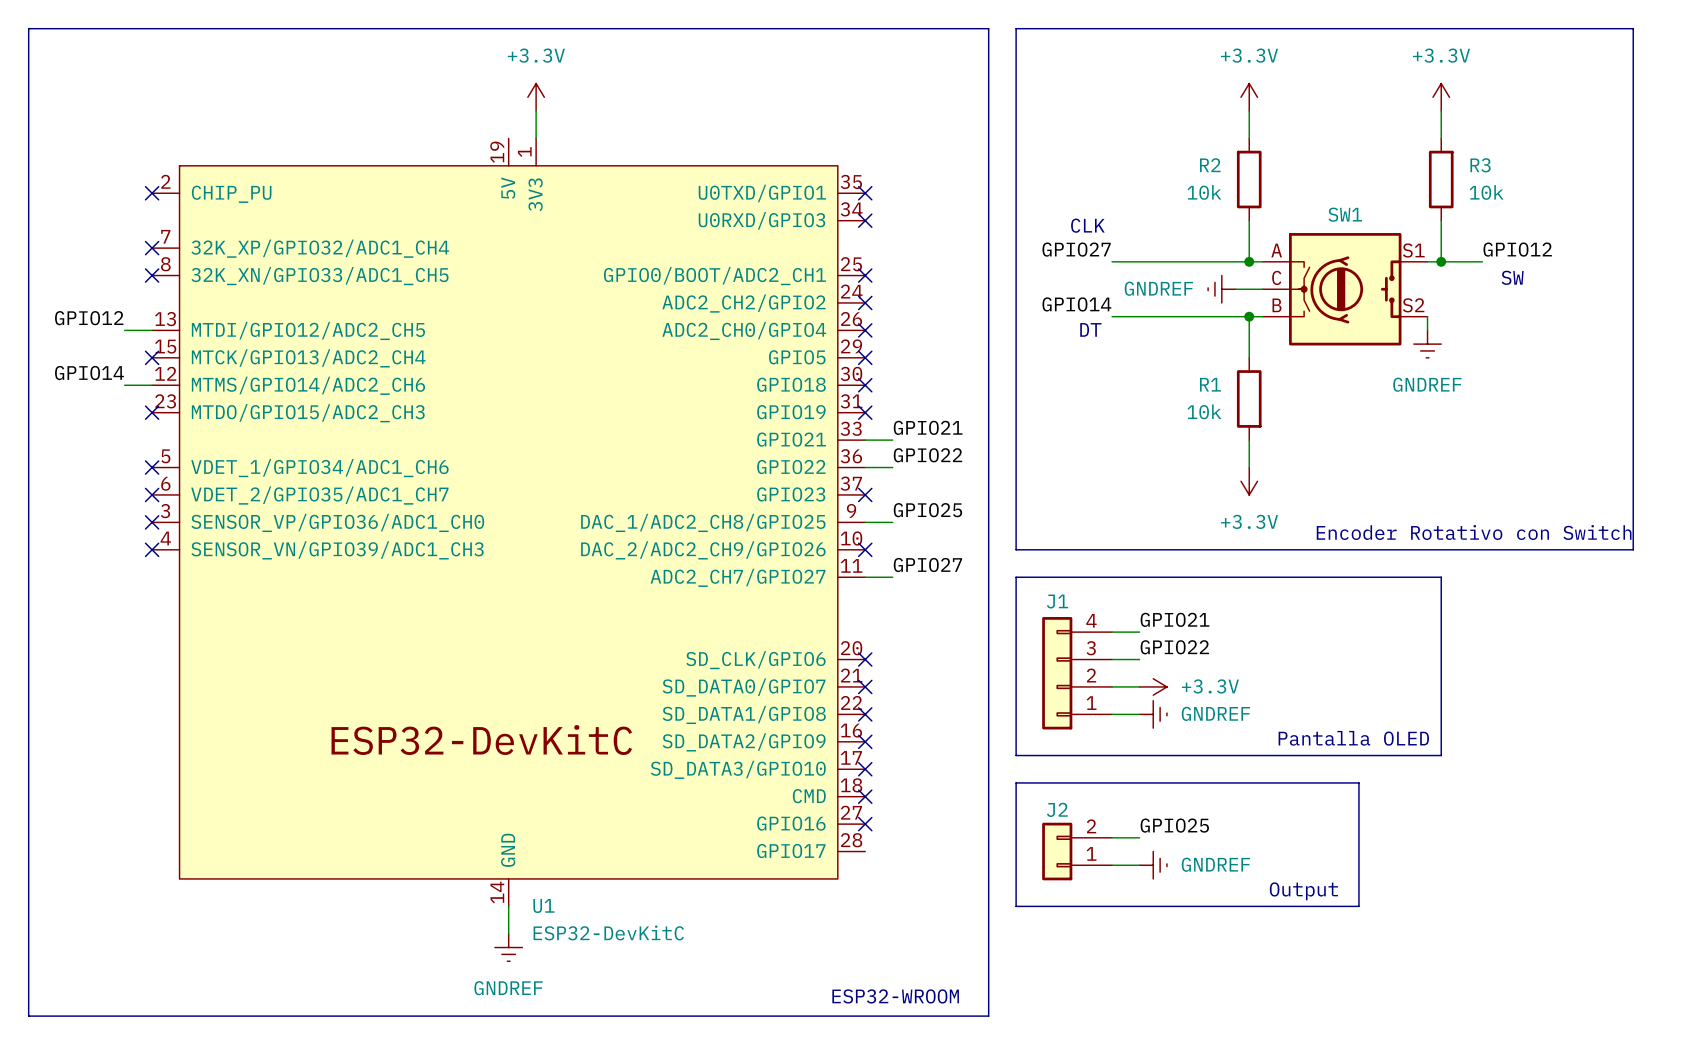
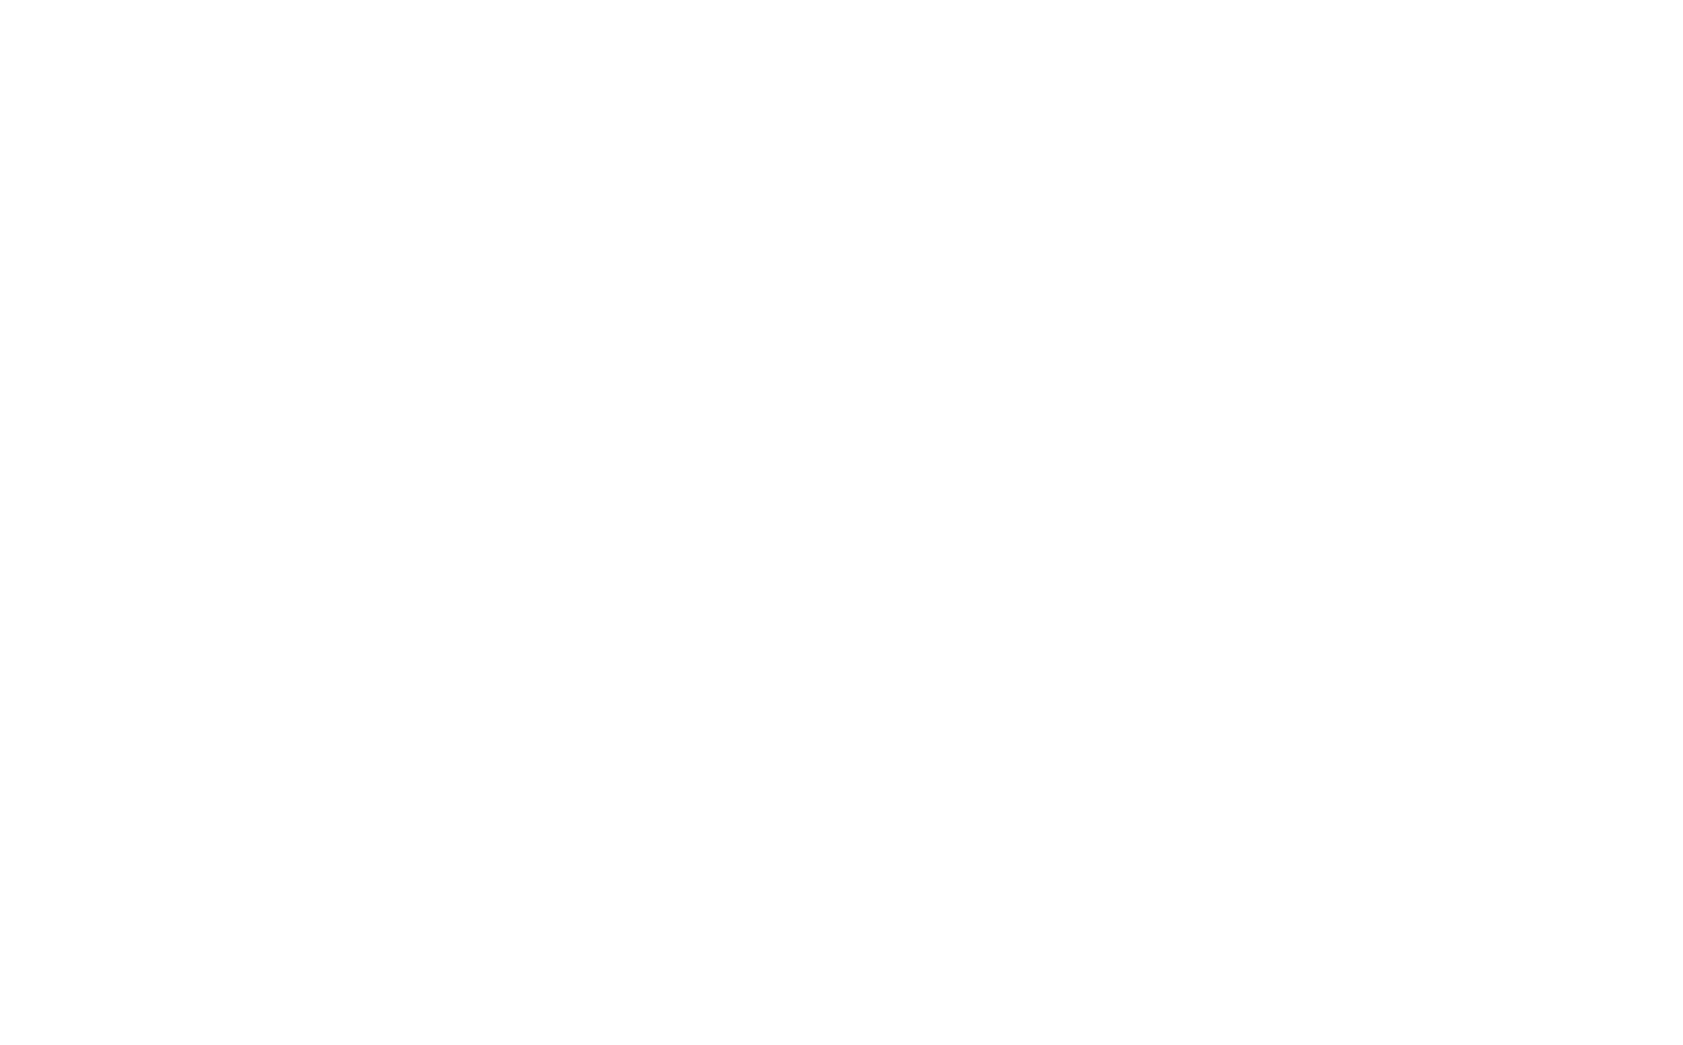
line: (28, 28) (988, 28) (988, 1016) (28, 1016) (28, 28) -> none
line: (1016, 28) (1016, 549) (1633, 549) (1633, 28) (1016, 28) -> none
power symbol: +3.3V (536, 97) -> none
power symbol: +3.3V (1249, 97) -> none
power symbol: +3.3V (1441, 97) -> none
wire: (536, 110) (536, 138) -> none
wire: (1249, 110) (1249, 138) -> none
wire: (1441, 110) (1441, 138) -> none
R2: 10k (1249, 179) -> none
R3: 10k (1441, 179) -> none
no-connect mark: (152, 193) -> none
no-connect mark: (865, 193) -> none
no-connect mark: (865, 220) -> none
wire: (1249, 220) (1249, 261) -> none
wire: (1441, 220) (1441, 261) -> none
text: CLK (1087, 225) -> none
no-connect mark: (152, 248) -> none
label: GPIO27 (1076, 249) -> none
label: GPIO12 (1517, 249) -> none
wire: (1112, 261) (1262, 261) -> none
junction: (1249, 261) -> none
wire: (1427, 261) (1482, 261) -> none
junction: (1441, 261) -> none
no-connect mark: (152, 275) -> none
no-connect mark: (865, 275) -> none
text: SW (1512, 277) -> none
power symbol: GNDREF (1221, 289) -> none
wire: (1235, 289) (1262, 289) -> none
SW1: (1345, 289) -> none
no-connect mark: (865, 302) -> none
label: GPIO14 (1076, 304) -> none
wire: (1112, 316) (1262, 316) -> none
wire: (1249, 316) (1249, 357) -> none
junction: (1249, 316) -> none
wire: (1427, 316) (1427, 330) -> none
label: GPIO12 (89, 318) -> none
text: DT (1090, 329) -> none
wire: (124, 330) (152, 330) -> none
no-connect mark: (865, 330) -> none
power symbol: GNDREF (1427, 344) -> none
no-connect mark: (152, 357) -> none
no-connect mark: (865, 357) -> none
label: GPIO14 (89, 373) -> none
wire: (124, 385) (152, 385) -> none
no-connect mark: (865, 385) -> none
R1: 10k (1249, 398) -> none
no-connect mark: (152, 412) -> none
no-connect mark: (865, 412) -> none
label: GPIO21 (928, 427) -> none
wire: (865, 440) (892, 440) -> none
wire: (1249, 440) (1249, 467) -> none
label: GPIO22 (927, 455) -> none
no-connect mark: (152, 467) -> none
wire: (865, 467) (892, 467) -> none
power symbol: +3.3V (1249, 481) -> none
no-connect mark: (152, 494) -> none
no-connect mark: (865, 494) -> none
label: GPIO25 (927, 510) -> none
no-connect mark: (152, 522) -> none
U1: ESP32-DevKitC (508, 522) -> none
wire: (865, 522) (892, 522) -> none
text: Encoder Rotativo con Switch (1474, 532) -> none
no-connect mark: (152, 549) -> none
no-connect mark: (865, 549) -> none
label: GPIO27 (927, 565) -> none
wire: (865, 577) (892, 577) -> none
line: (1016, 577) (1441, 577) (1441, 755) (1016, 755) (1016, 577) -> none
label: GPIO21 (1174, 619) -> none
wire: (1112, 632) (1139, 632) -> none
label: GPIO22 (1174, 647) -> none
no-connect mark: (865, 659) -> none
wire: (1112, 659) (1139, 659) -> none
J1: (1077, 673) -> none
no-connect mark: (865, 686) -> none
wire: (1112, 686) (1139, 686) -> none
power symbol: +3.3V (1153, 686) -> none
no-connect mark: (865, 714) -> none
wire: (1112, 714) (1139, 714) -> none
power symbol: GNDREF (1153, 714) -> none
text: Pantalla OLED (1353, 738) -> none
no-connect mark: (865, 741) -> none
no-connect mark: (865, 769) -> none
line: (1016, 782) (1016, 906) (1358, 906) (1358, 782) (1016, 782) -> none
no-connect mark: (865, 796) -> none
no-connect mark: (865, 824) -> none
label: GPIO25 (1174, 825) -> none
wire: (1112, 837) (1139, 837) -> none
J2: (1077, 851) -> none
wire: (1112, 865) (1139, 865) -> none
power symbol: GNDREF (1153, 865) -> none
text: Output (1303, 891) -> none
wire: (508, 906) (508, 933) -> none
power symbol: GNDREF (508, 947) -> none
text: ESP32-WROOM (895, 996) -> none

